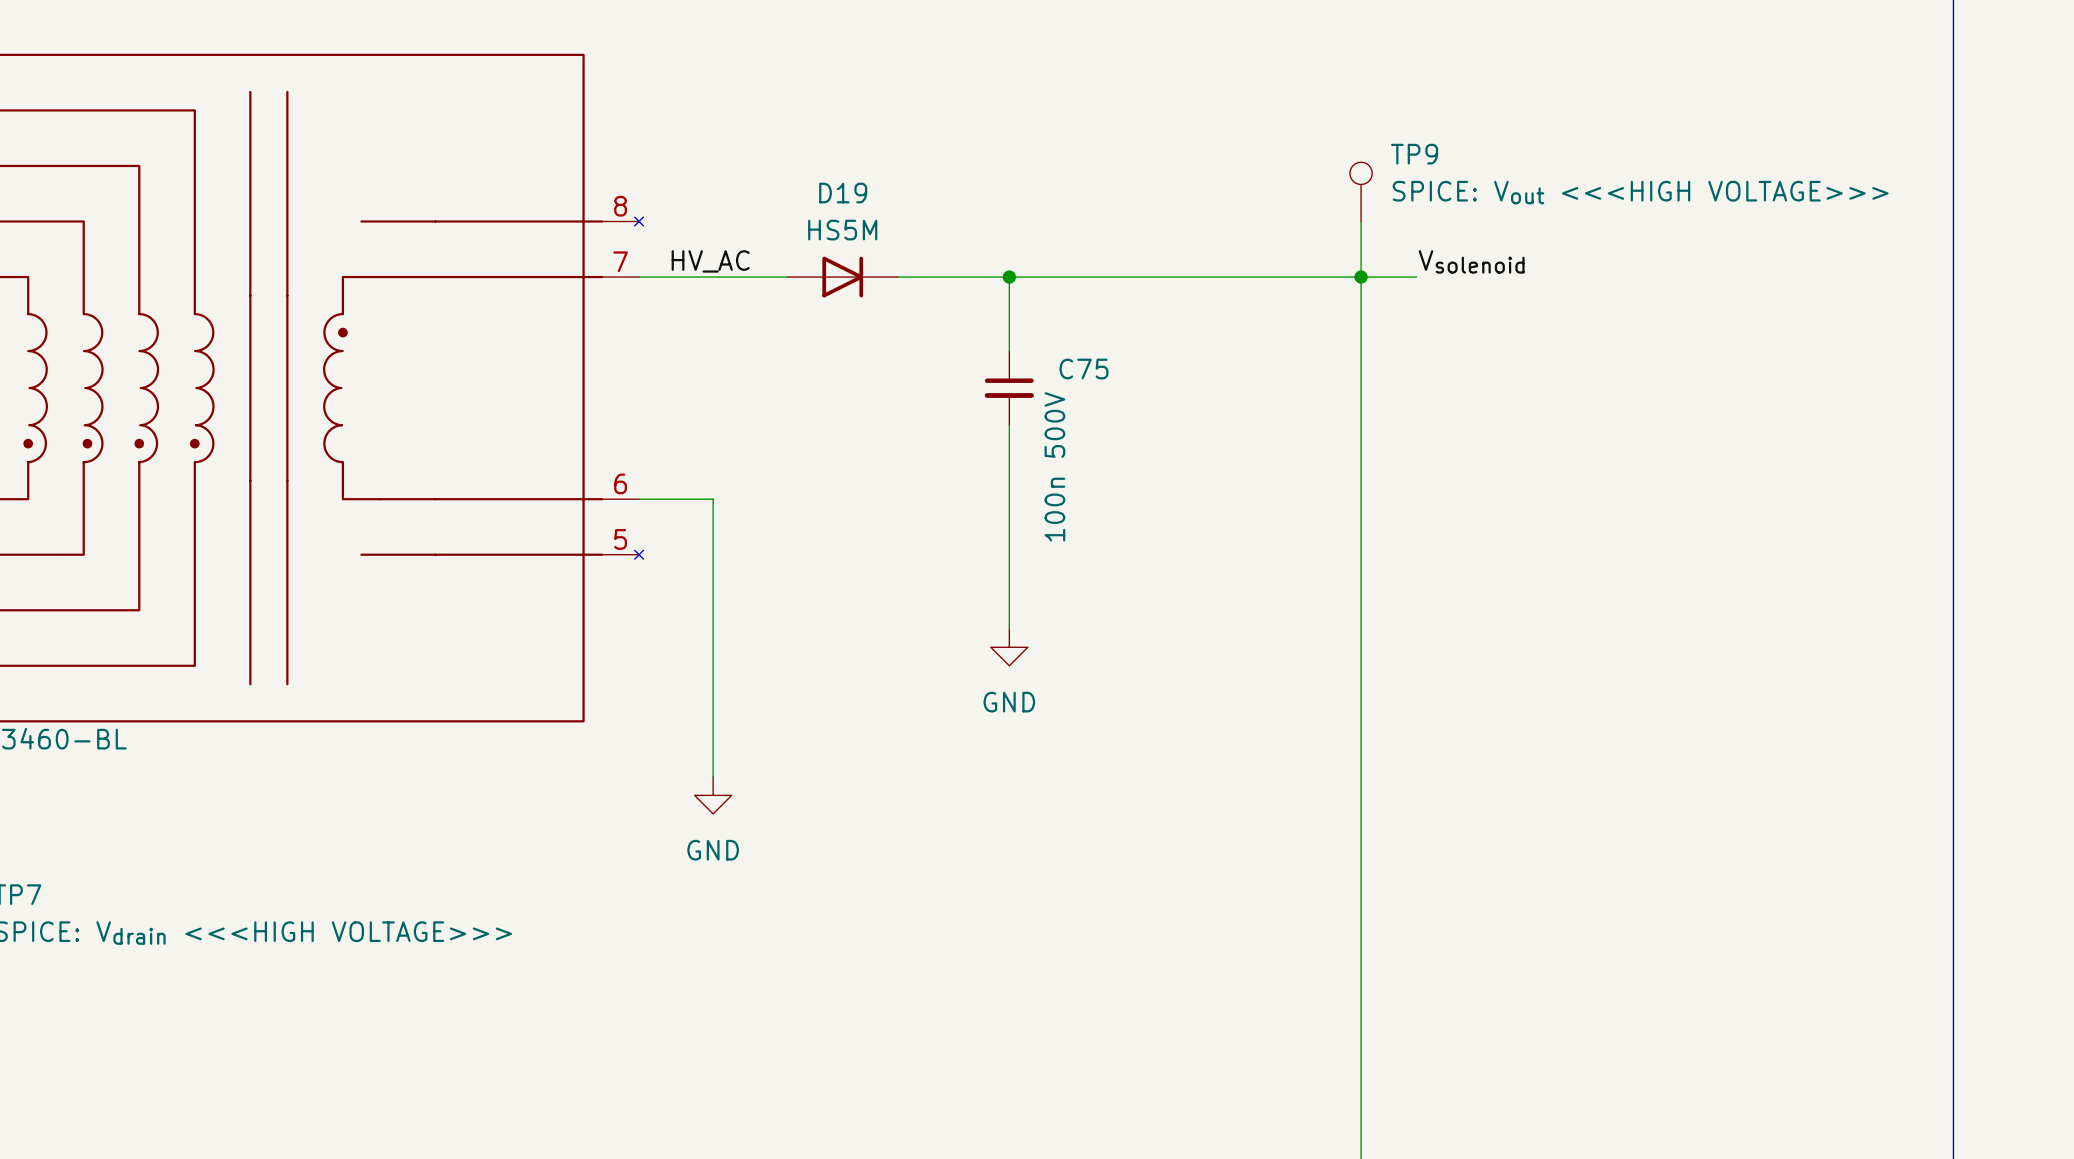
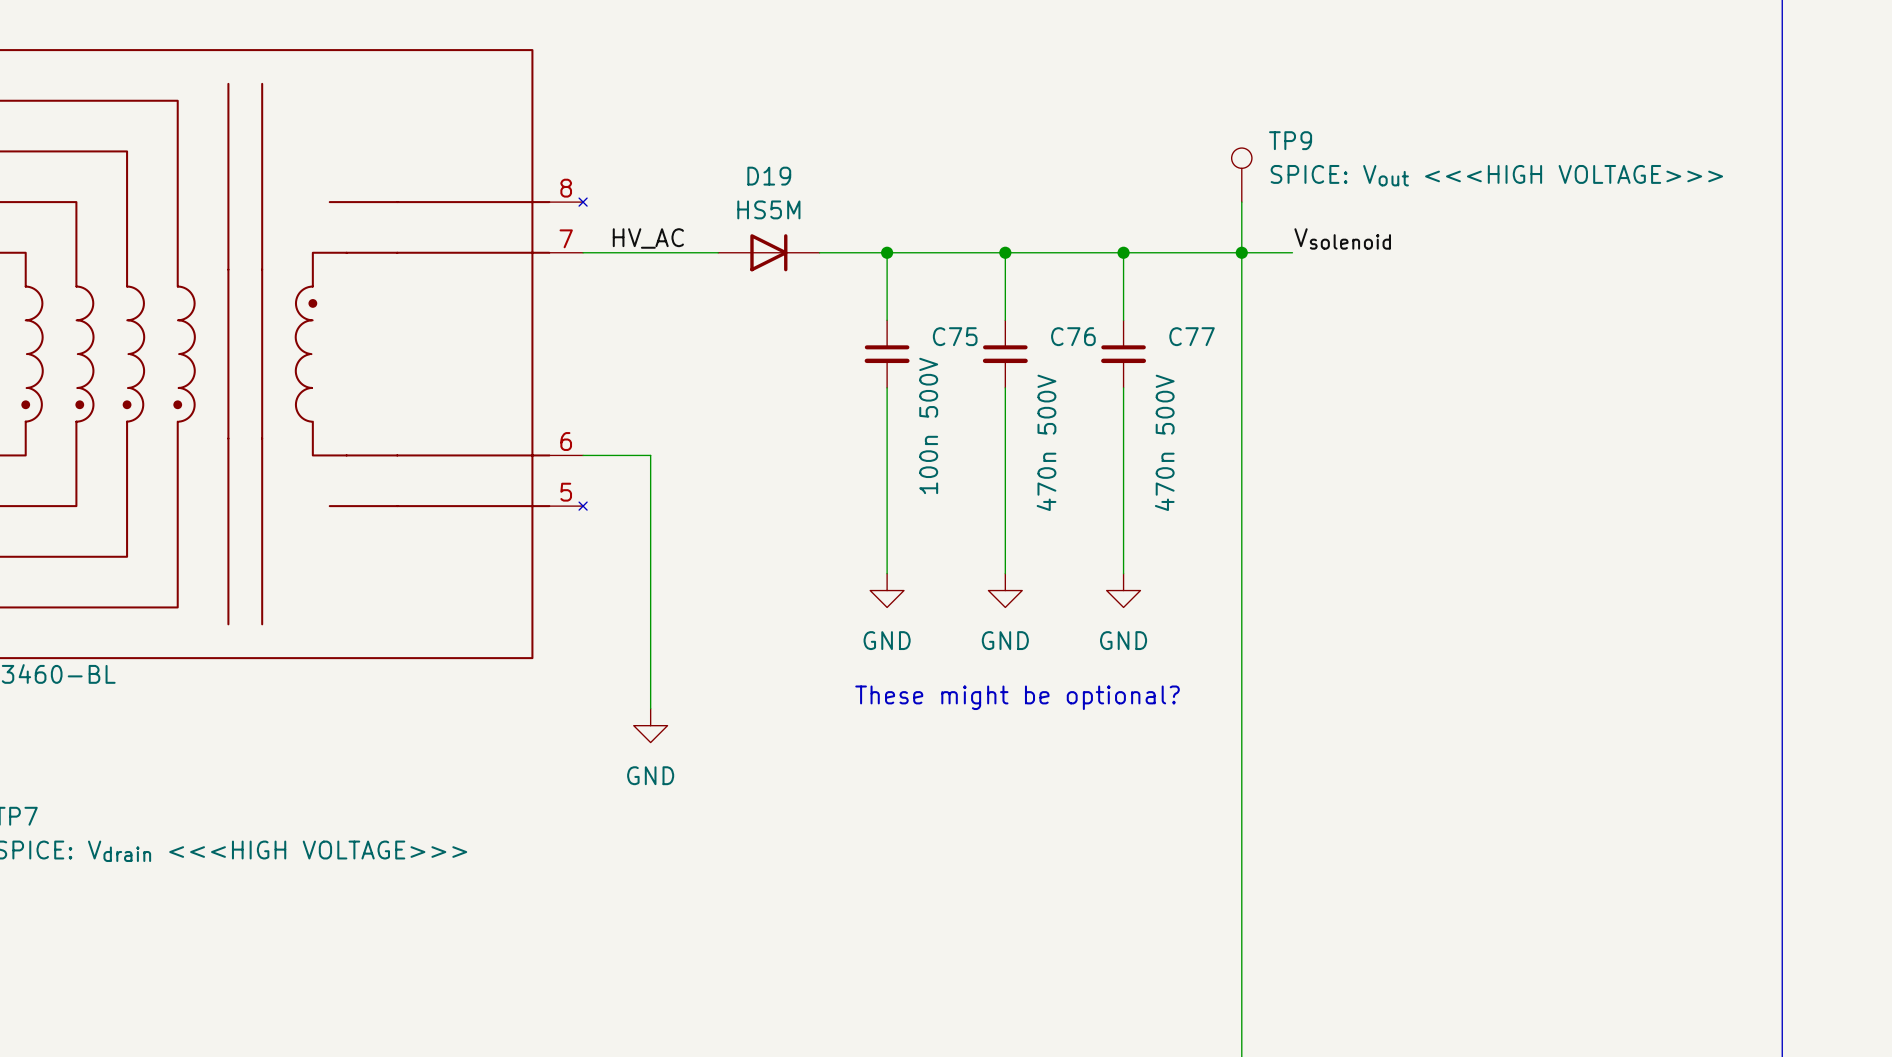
wire: (1009, 277) (1009, 351) -> (887, 252) (887, 320)
junction position: (1009, 277) -> (887, 252)
wire: none -> (1005, 252) (1005, 320)
junction: none -> (1005, 252)
wire: none -> (1123, 252) (1123, 320)
junction: none -> (1123, 252)
C75 position: (1009, 388) -> (887, 354)
C76: none -> 470n 500V (1005, 354)
C77: none -> 470n 500V (1123, 354)
wire: (1009, 425) (1009, 628) -> (887, 387) (887, 573)
wire: none -> (1005, 387) (1005, 573)
wire: none -> (1123, 387) (1123, 573)
power symbol position: GND (1009, 647) -> GND (887, 590)
power symbol: none -> GND (1005, 590)
power symbol: none -> GND (1123, 590)
text: none -> These might be optional? (1017, 697)

